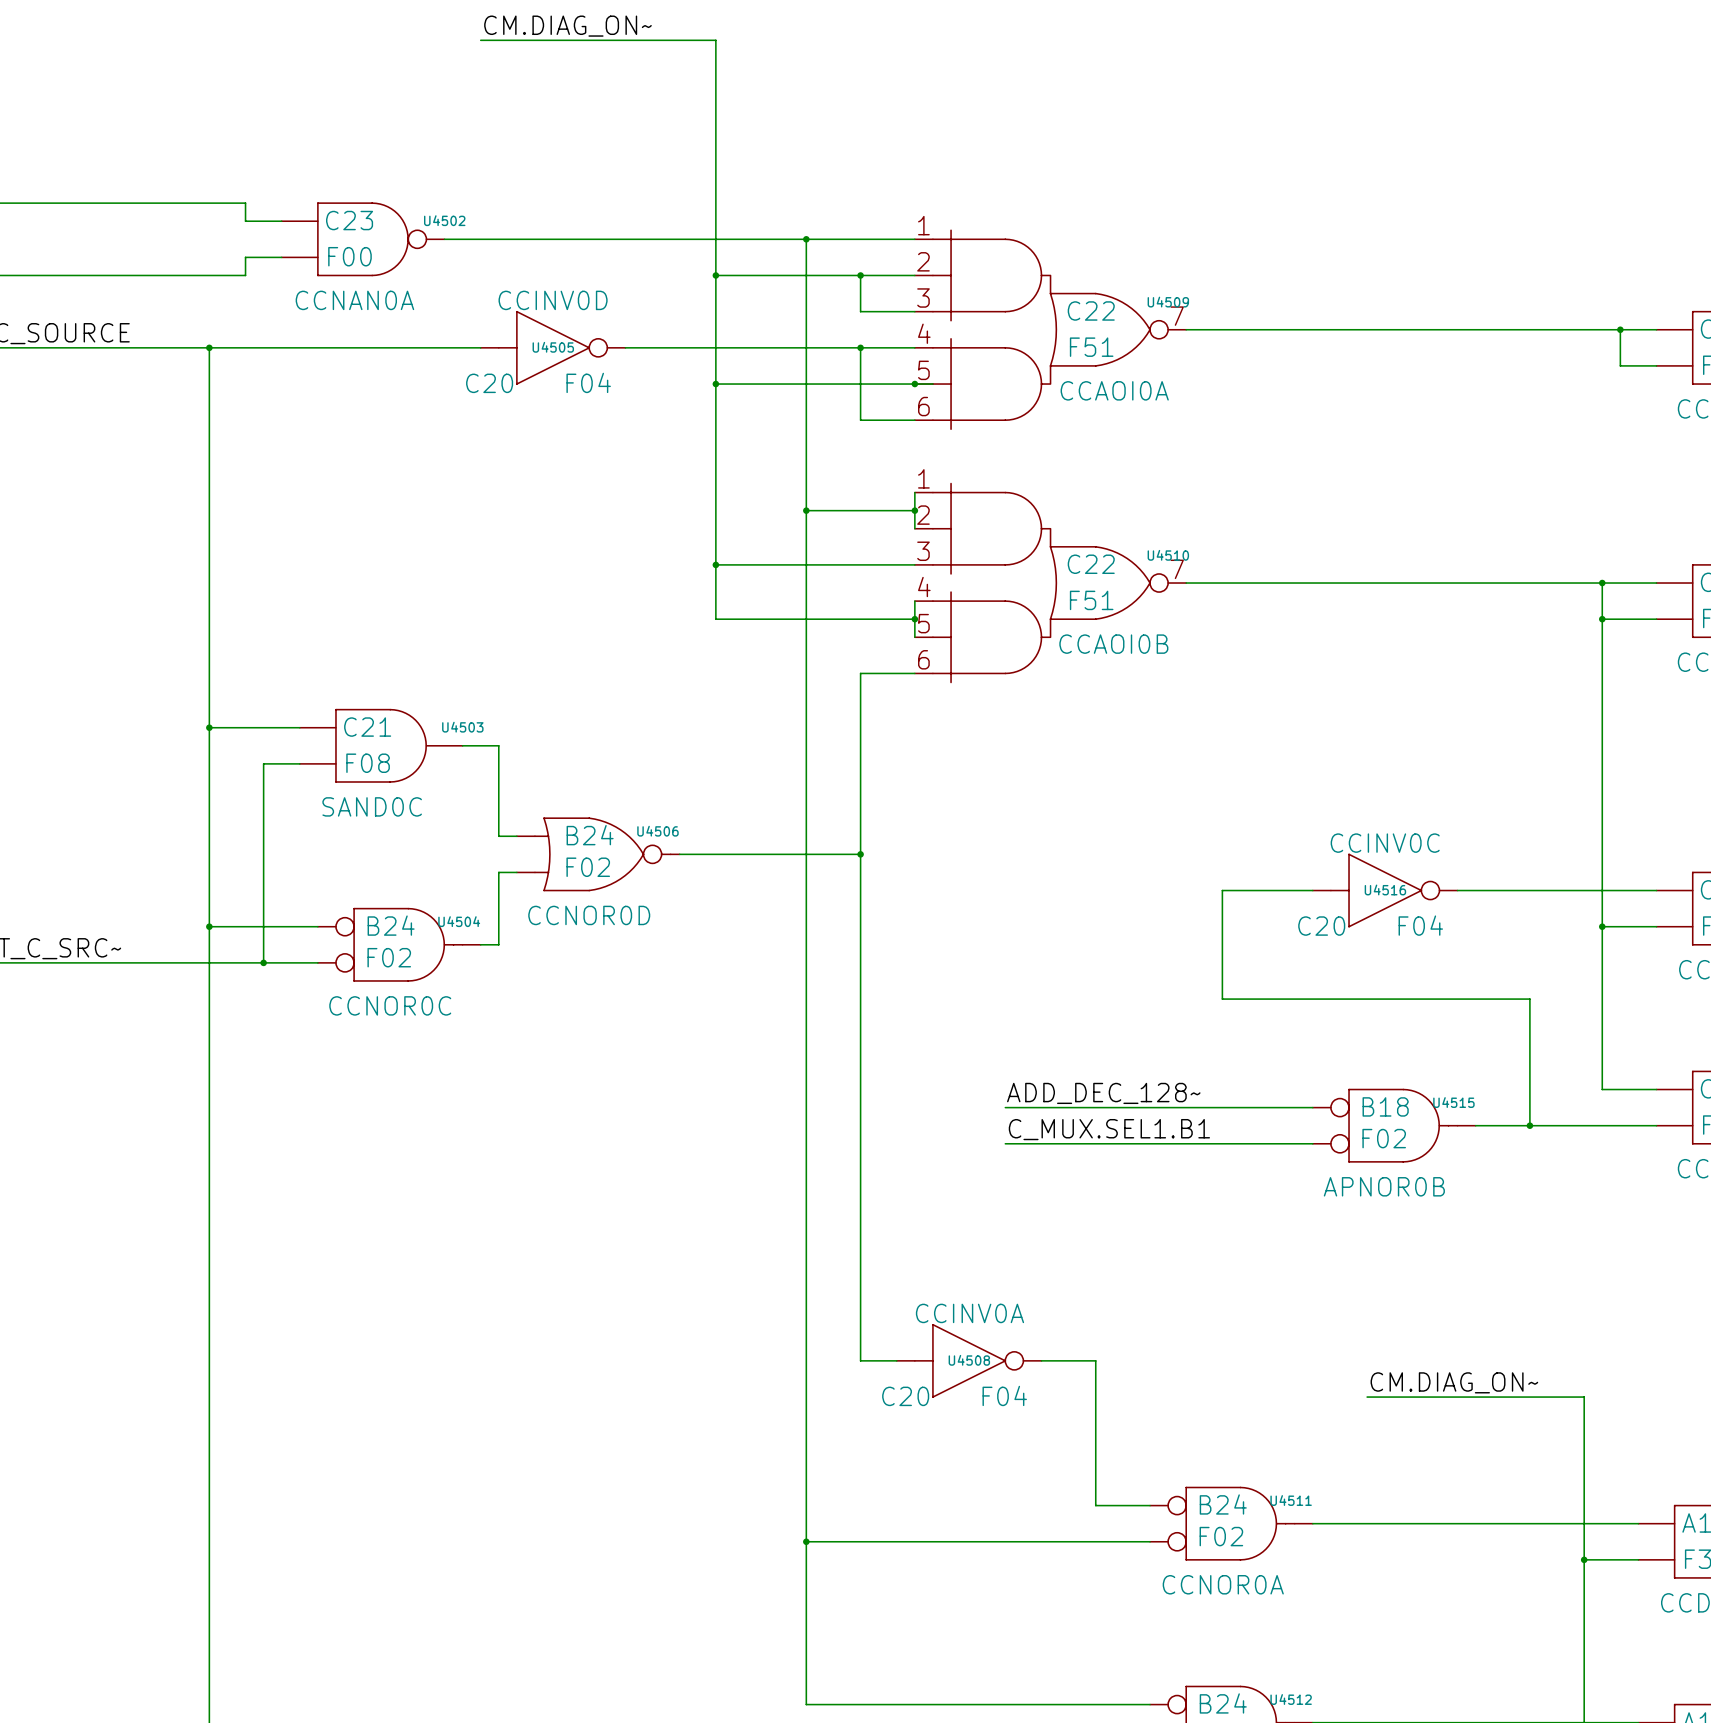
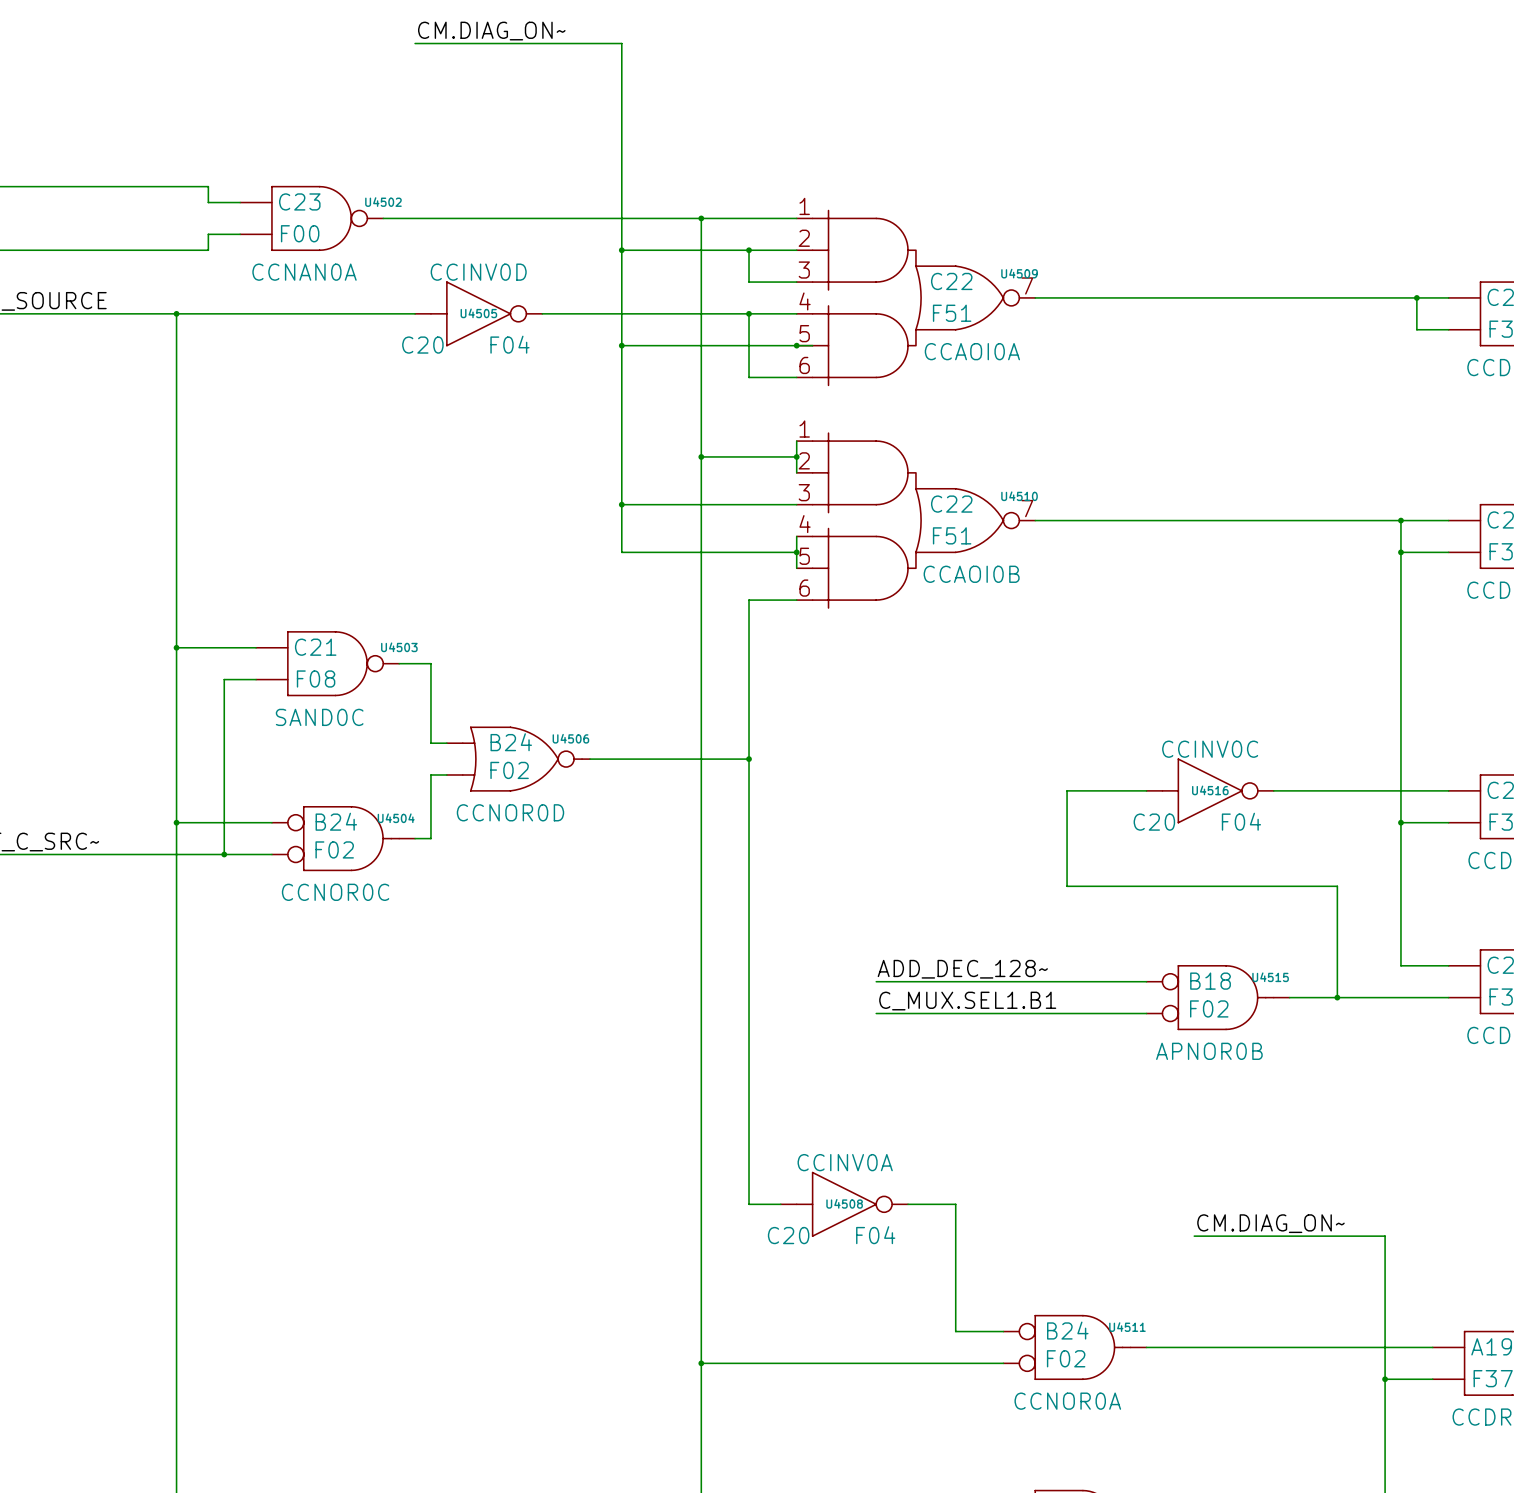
U4503 symbol: [299, 709, 463, 783] -> [256, 631, 400, 696]

